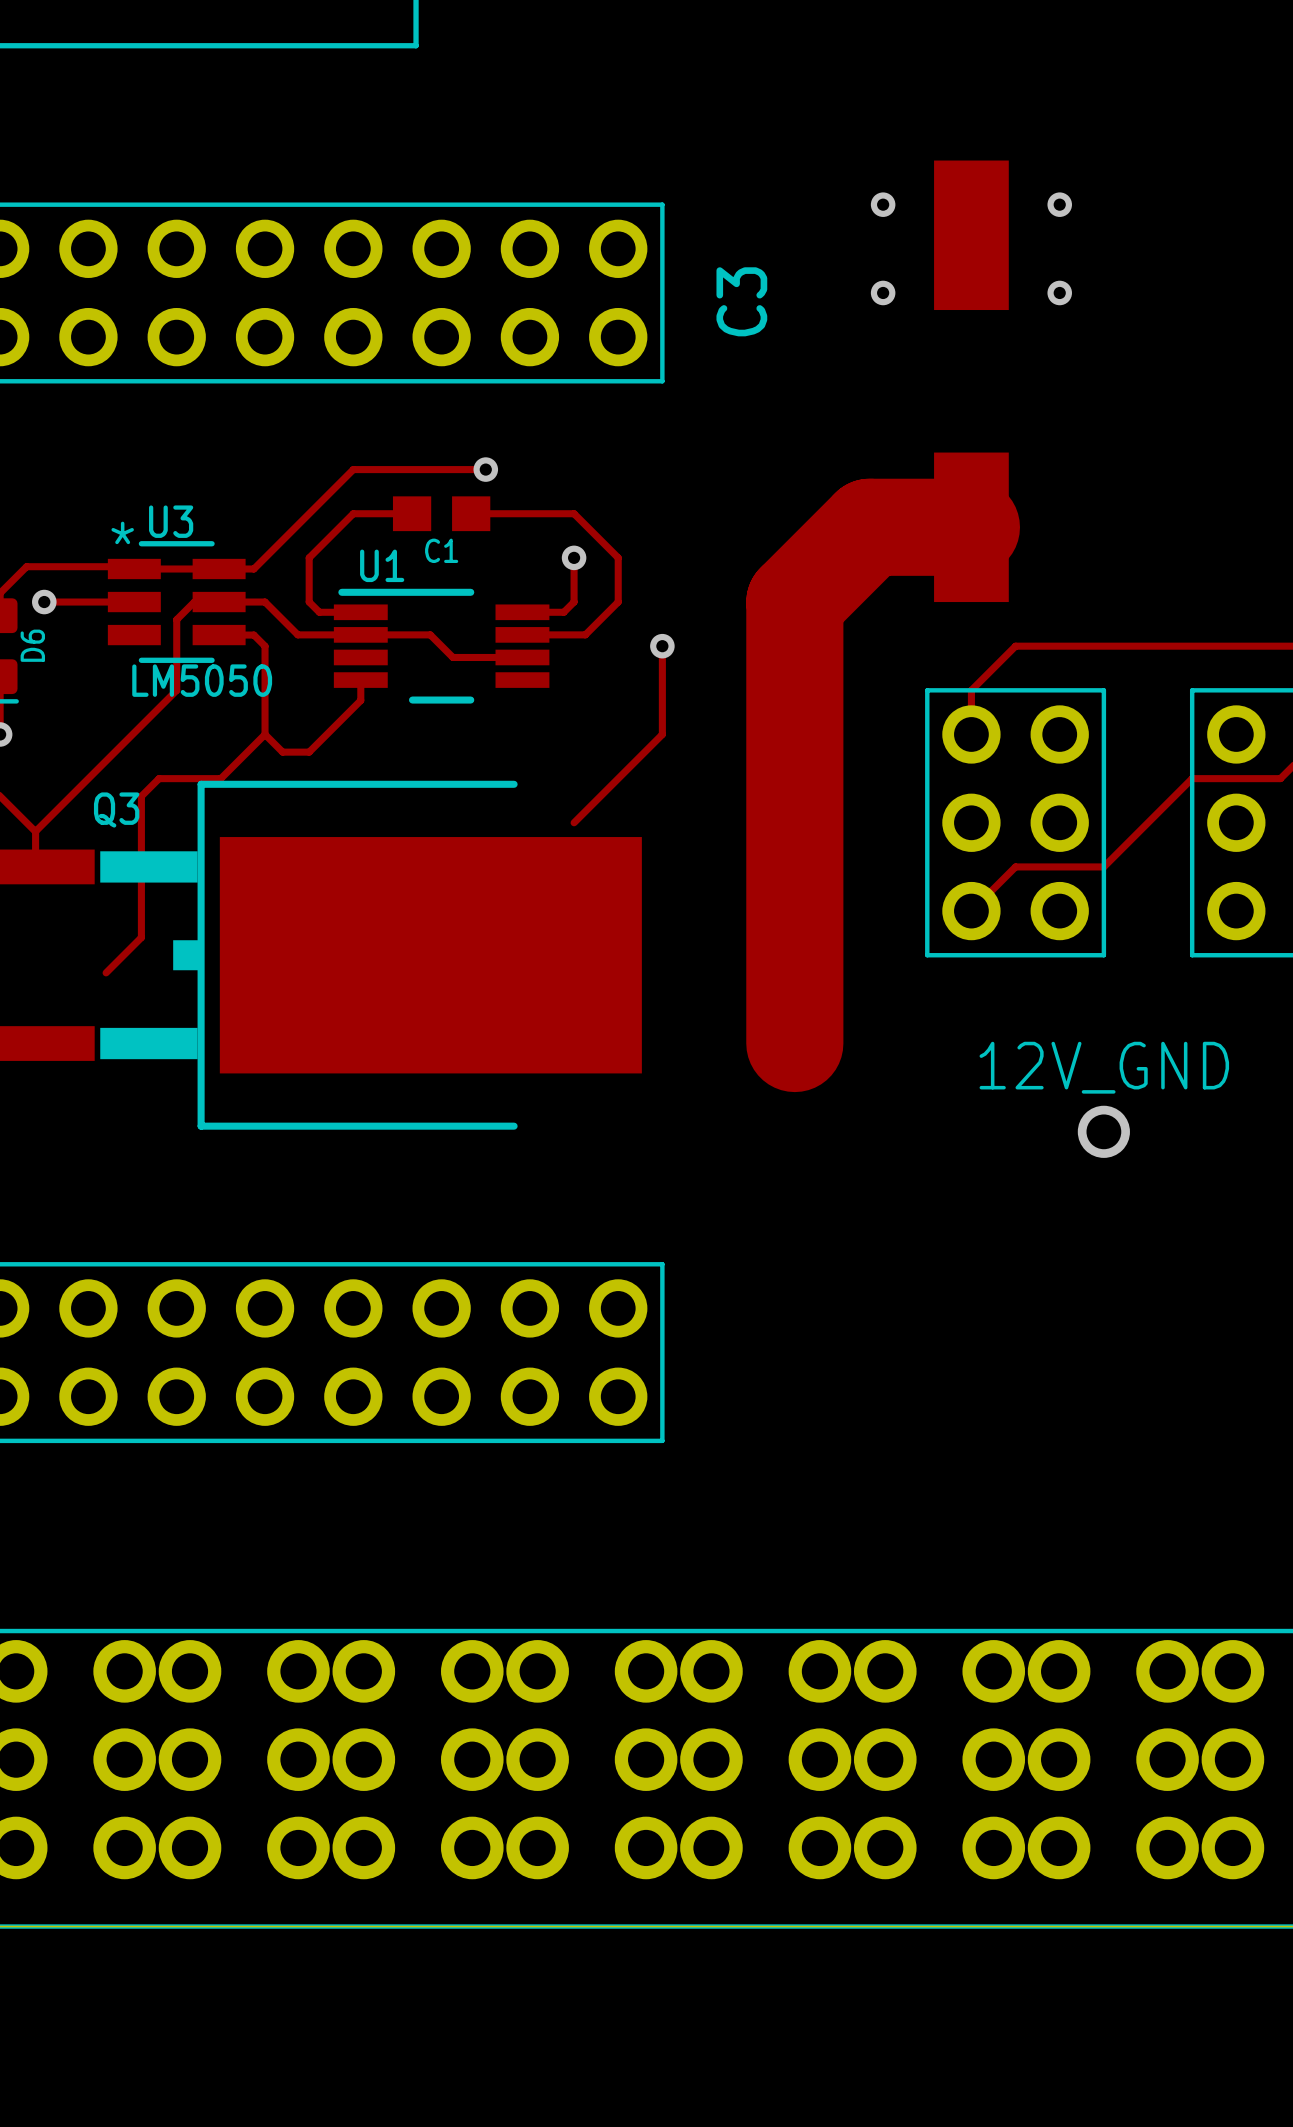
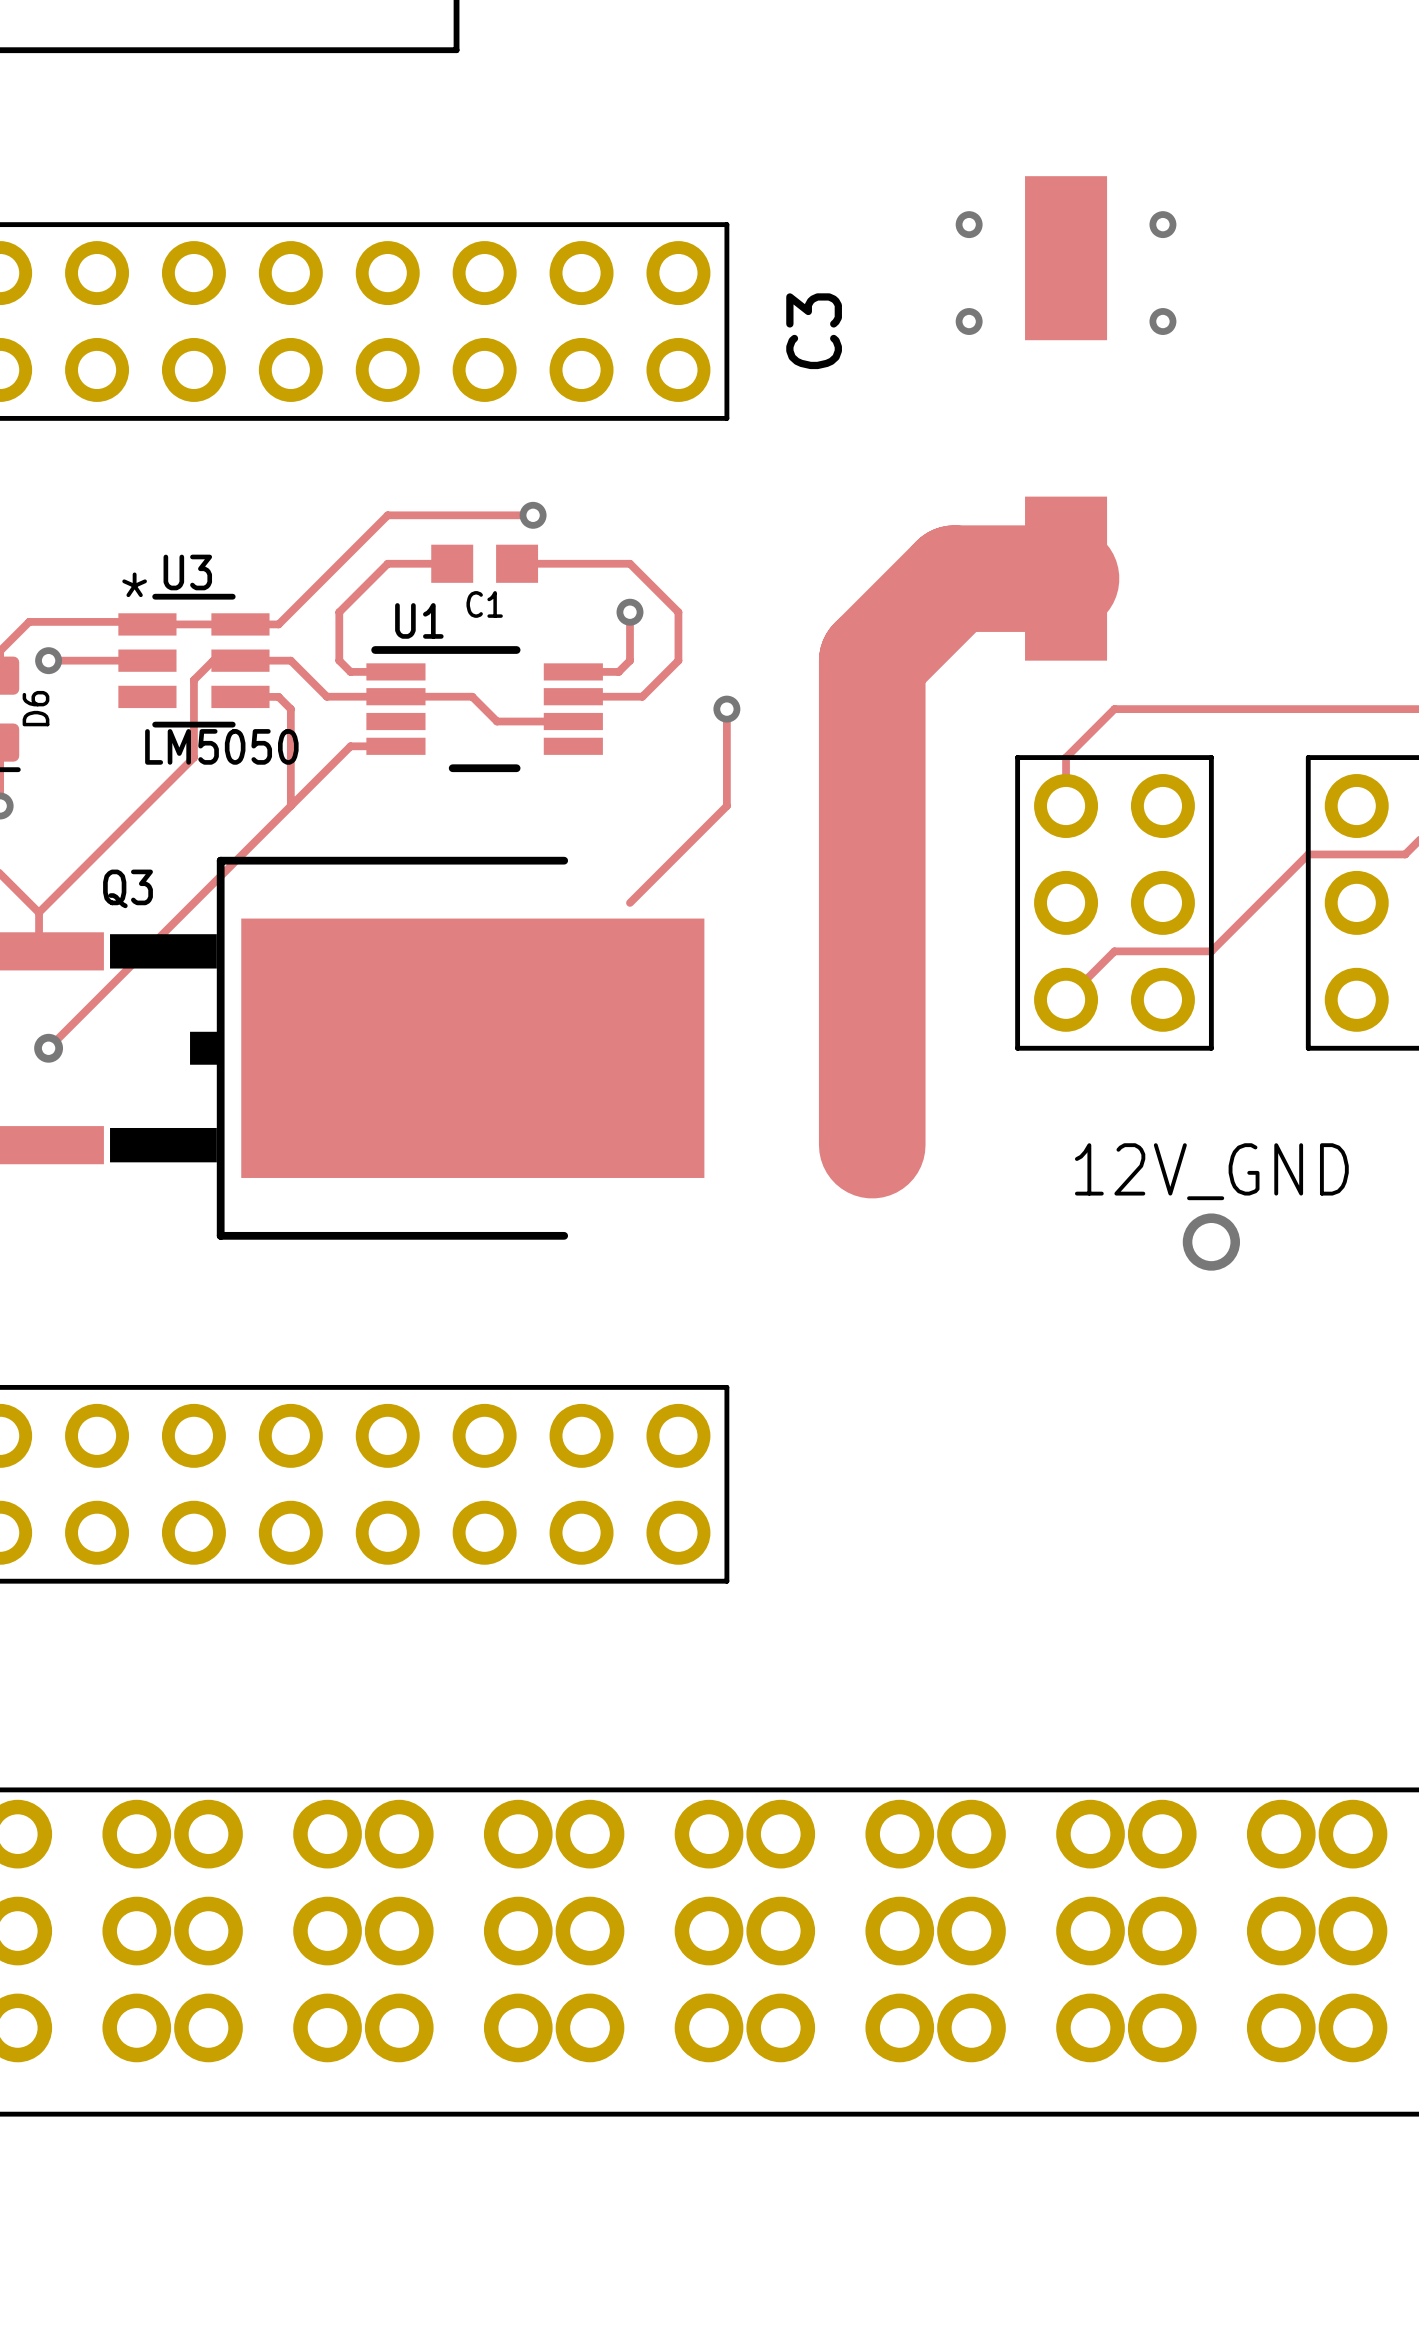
track: (360, 680) (360, 700) (309, 752) (282, 752) (265, 734) -> (395, 746) (350, 746) (290, 806)
track: (220, 778) (159, 778) (141, 796) (141, 937) (106, 972) -> (242, 854) (48, 1048)
via: none -> (48, 1048)

